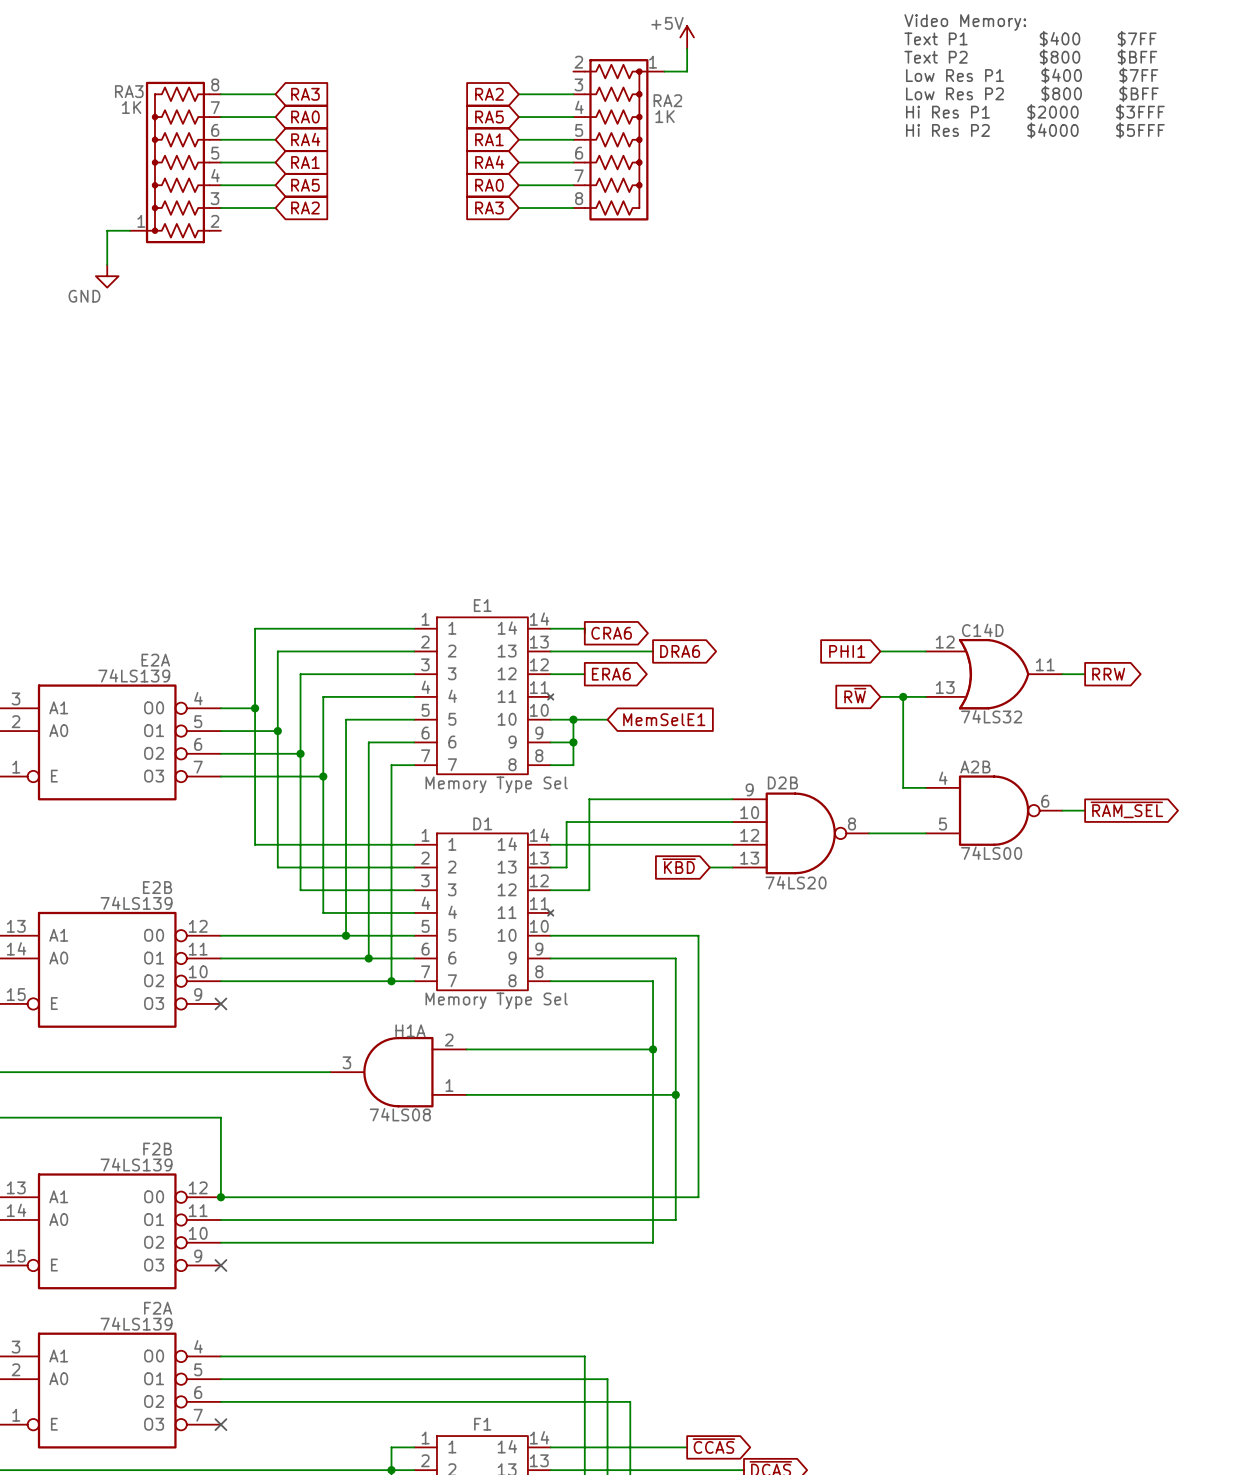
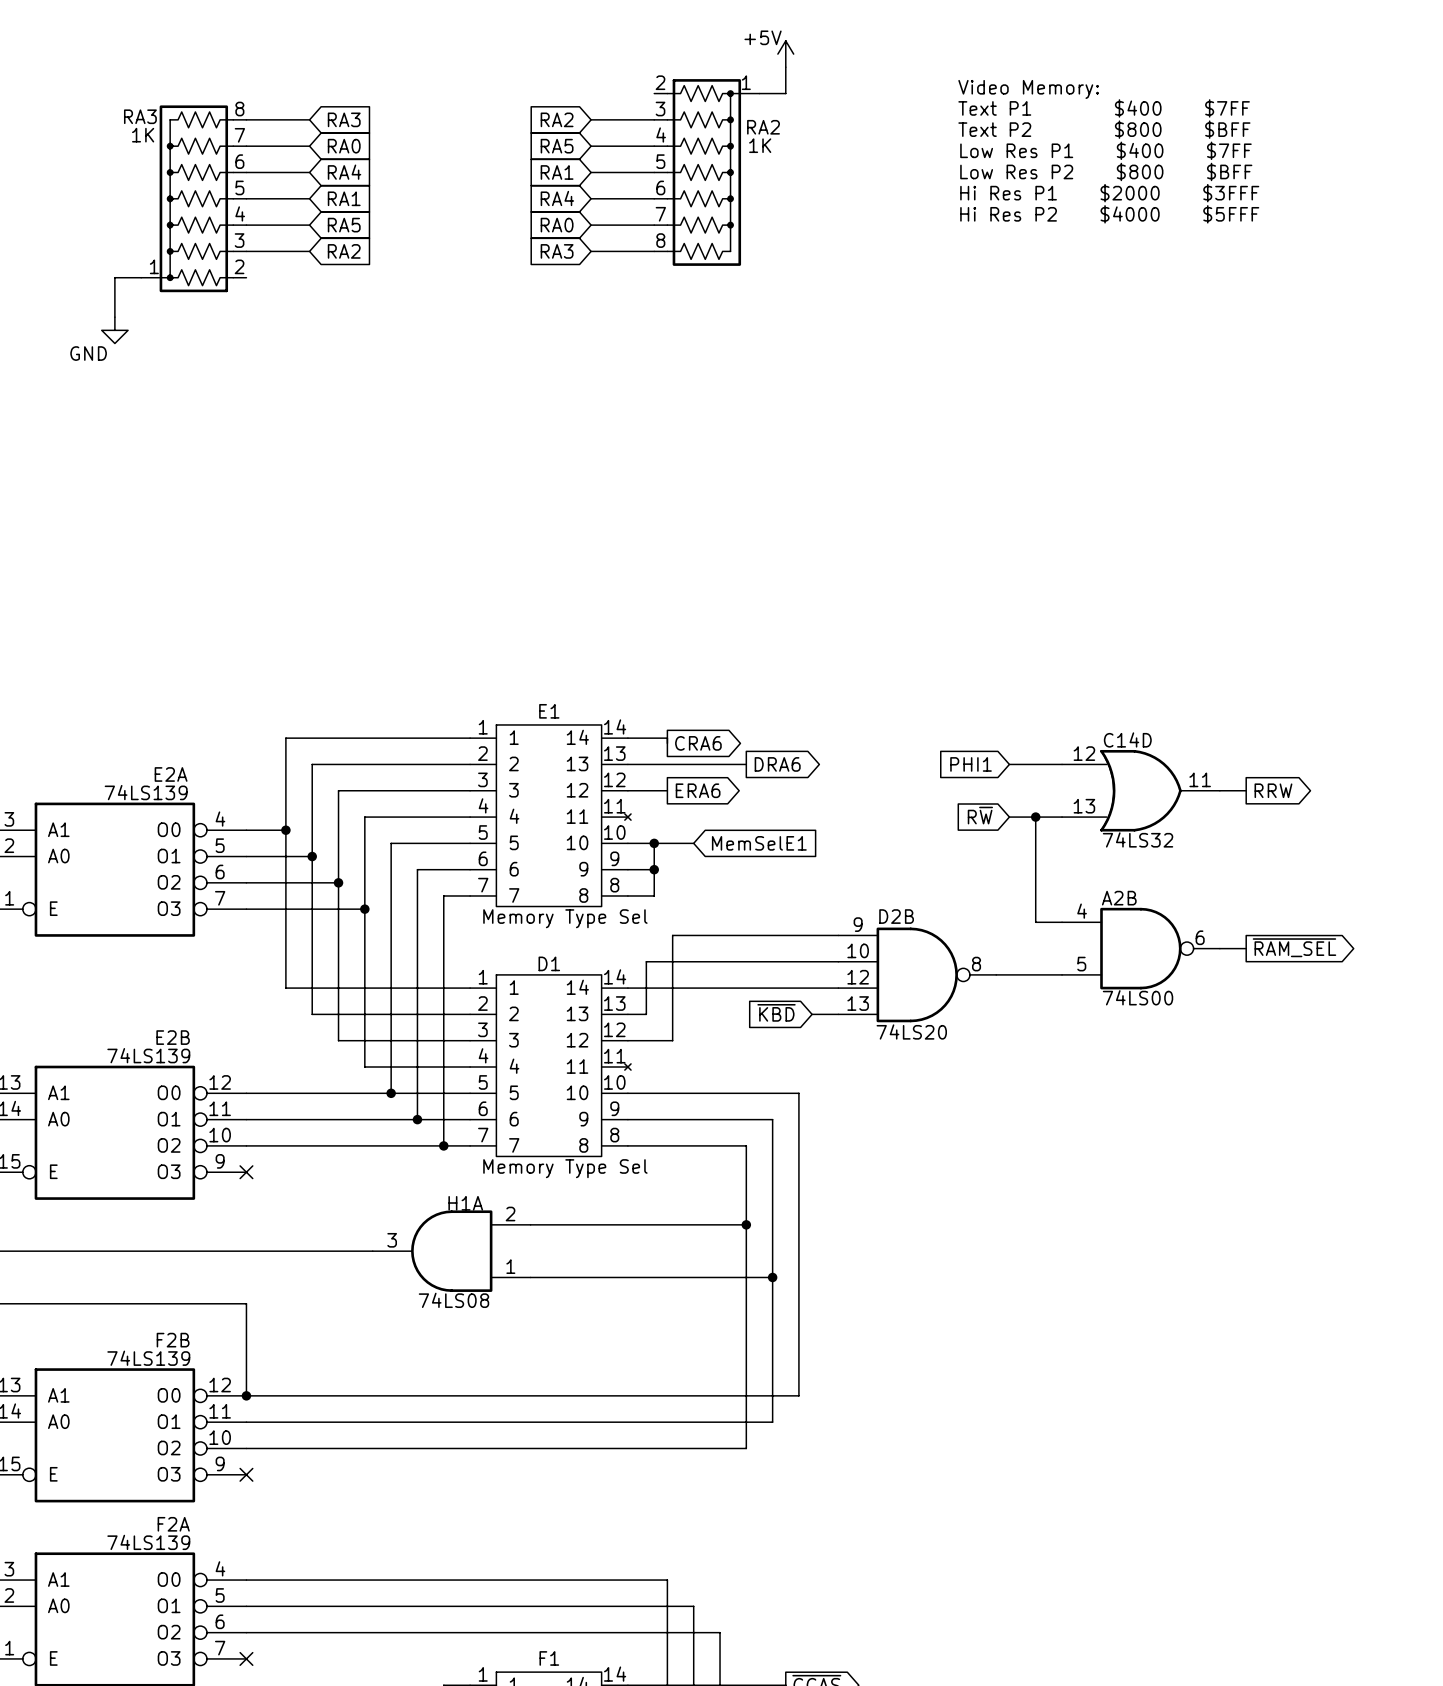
text position: Video Memory: (965, 22) -> Video Memory: (1028, 89)
text position: Text P1 $400 $7FF (1030, 38) -> Text P1 $400 $7FF (1104, 108)
text position: Text P2 $800 $BFF (1030, 57) -> Text P2 $800 $BFF (1104, 129)
text position: Low Res P1 $400 $7FF (1032, 75) -> Low Res P1 $400 $7FF (1105, 150)
text position: Low Res P2 $800 $BFF (1032, 93) -> Low Res P2 $800 $BFF (1106, 171)
text position: Hi Res P1 $2000 $3FFF (1035, 112) -> Hi Res P1 $2000 $3FFF (1109, 193)
text position: Hi Res P2 $4000 $5FFF (1035, 130) -> Hi Res P2 $4000 $5FFF (1109, 214)

